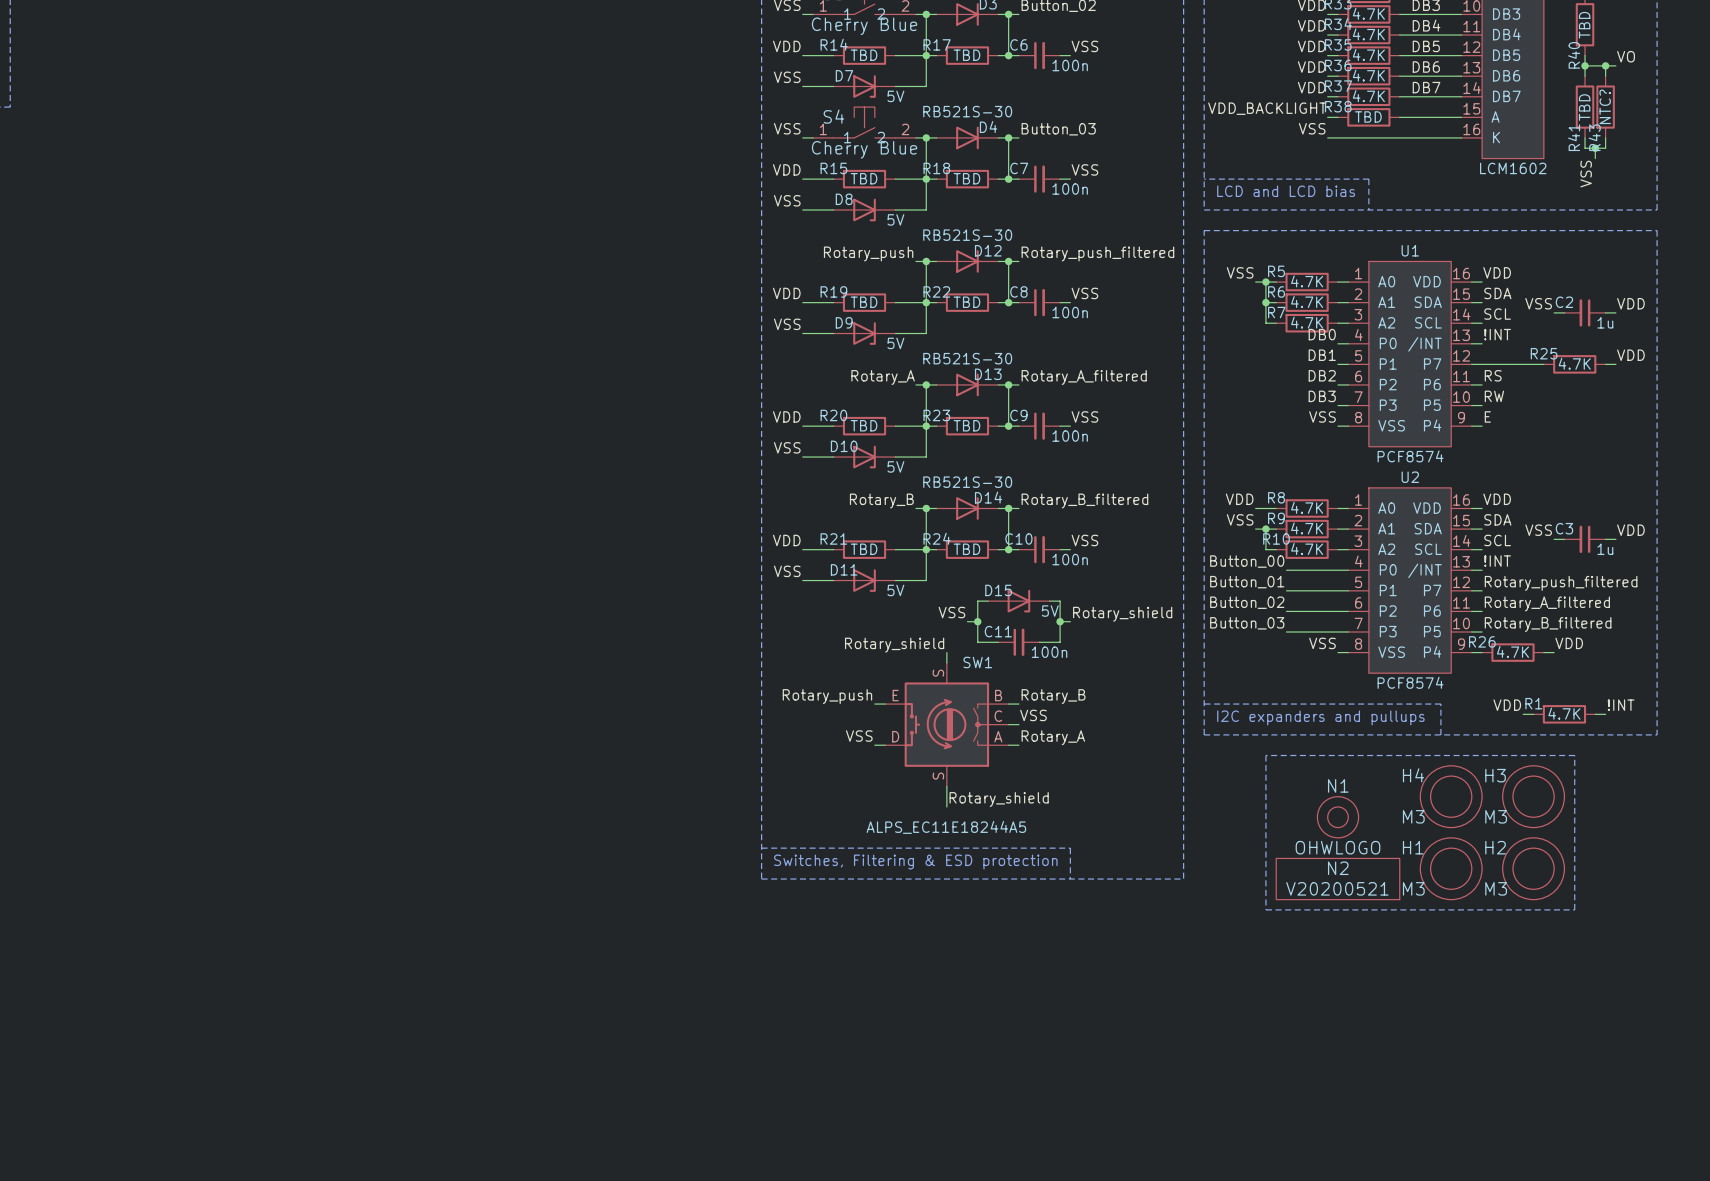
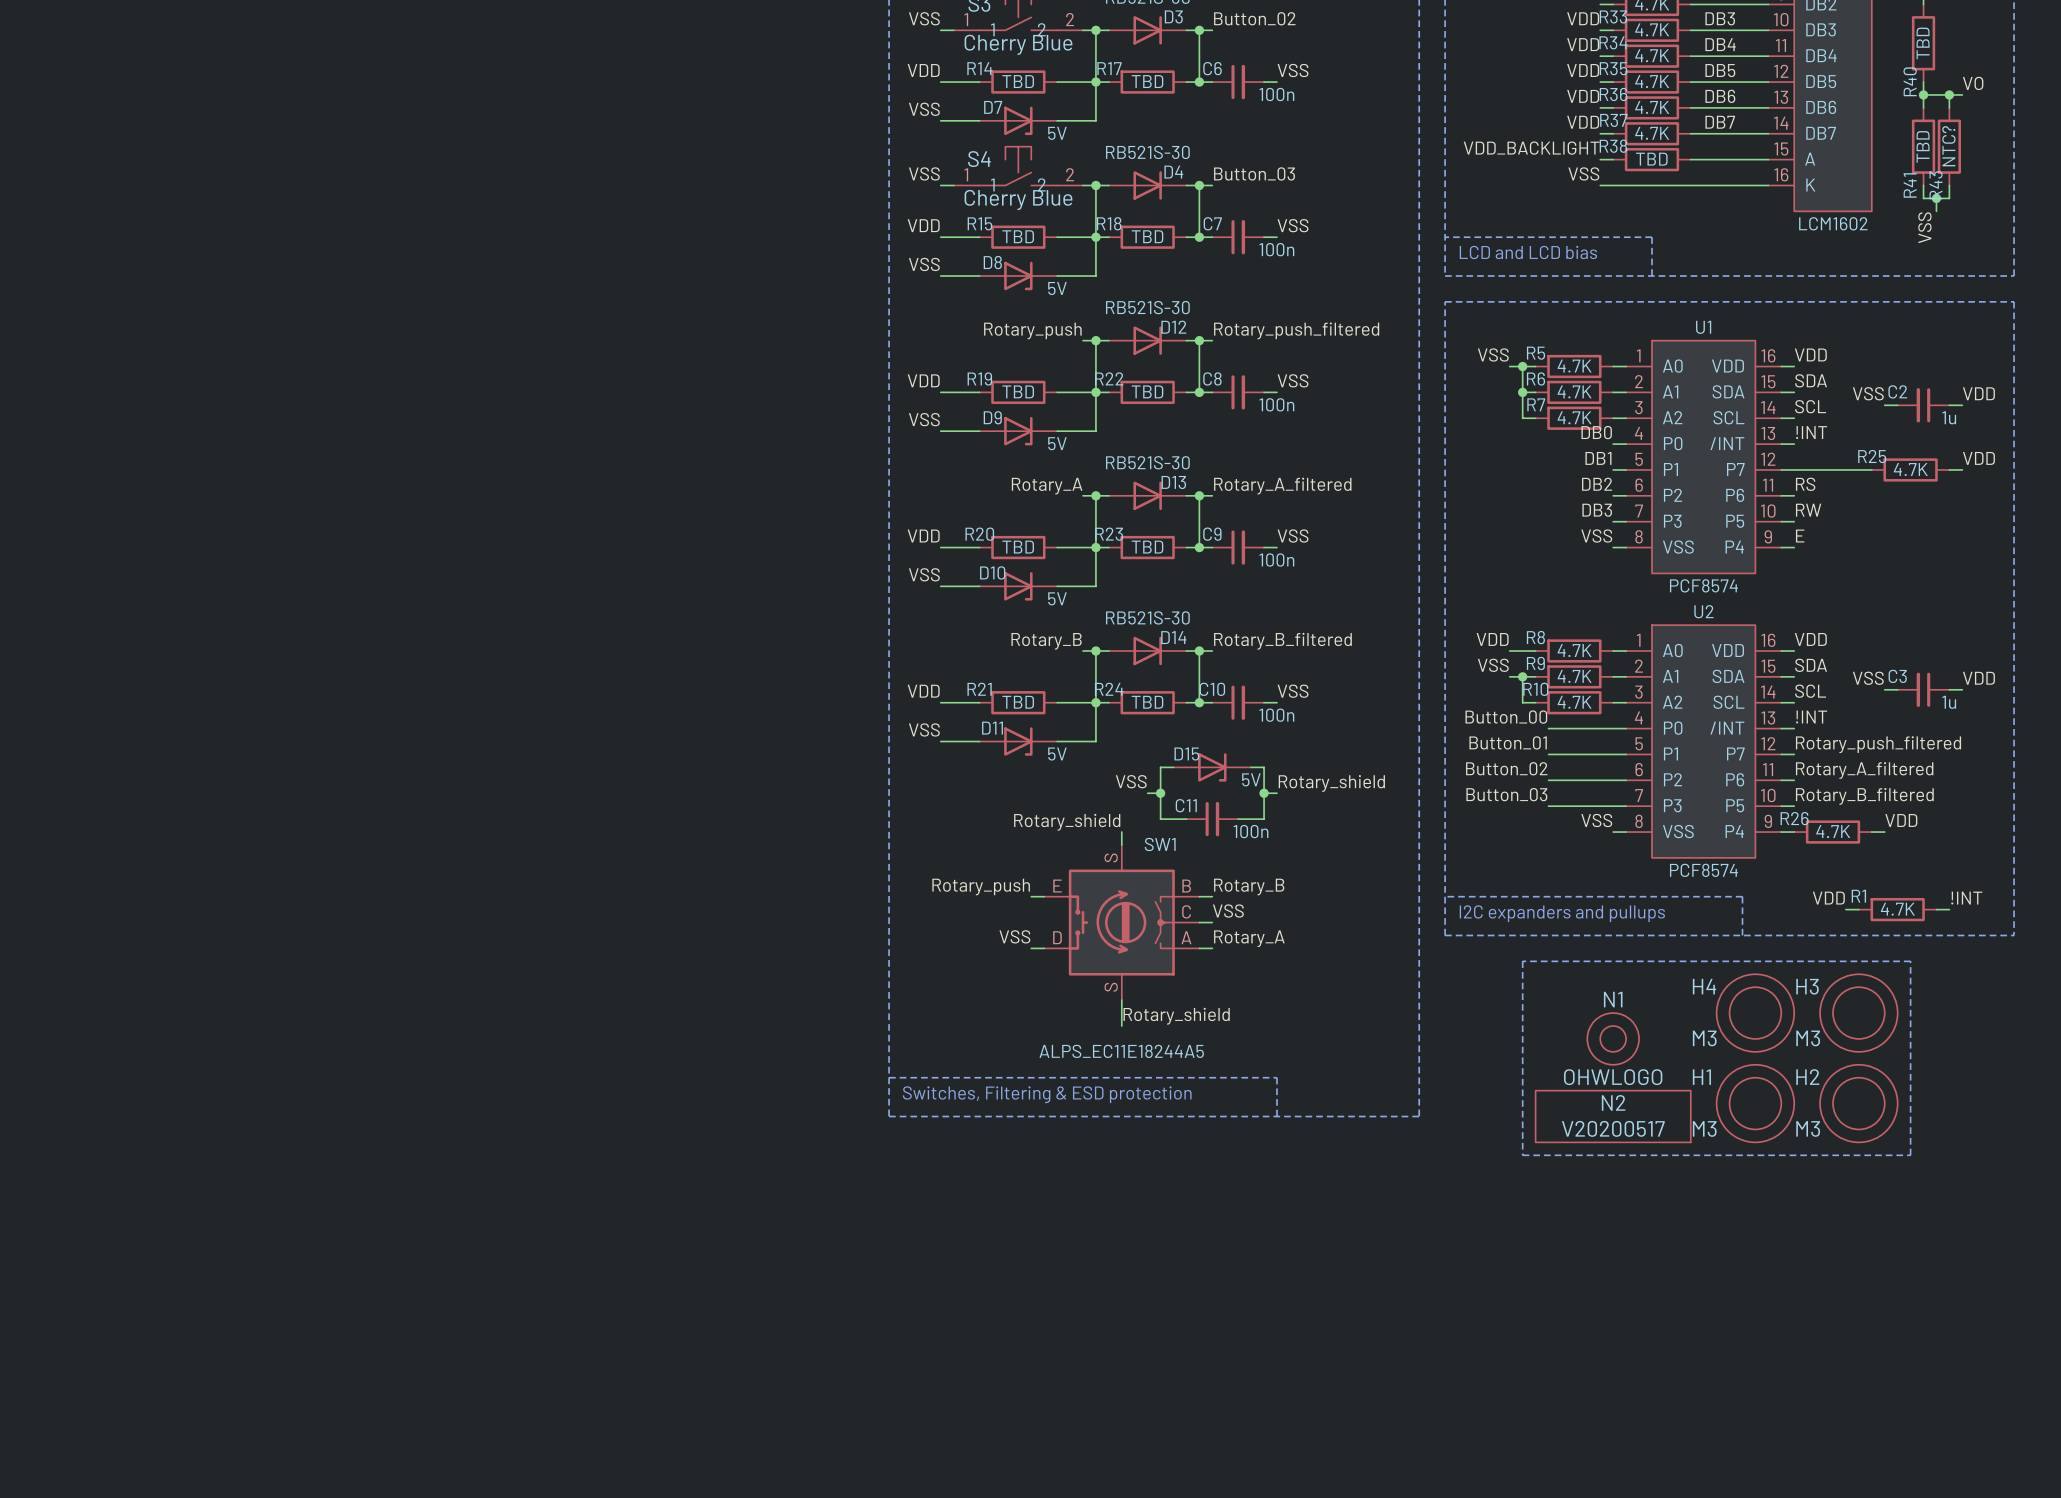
N2 value: V20200521 (1337, 888) -> V20200517 (1613, 1128)

